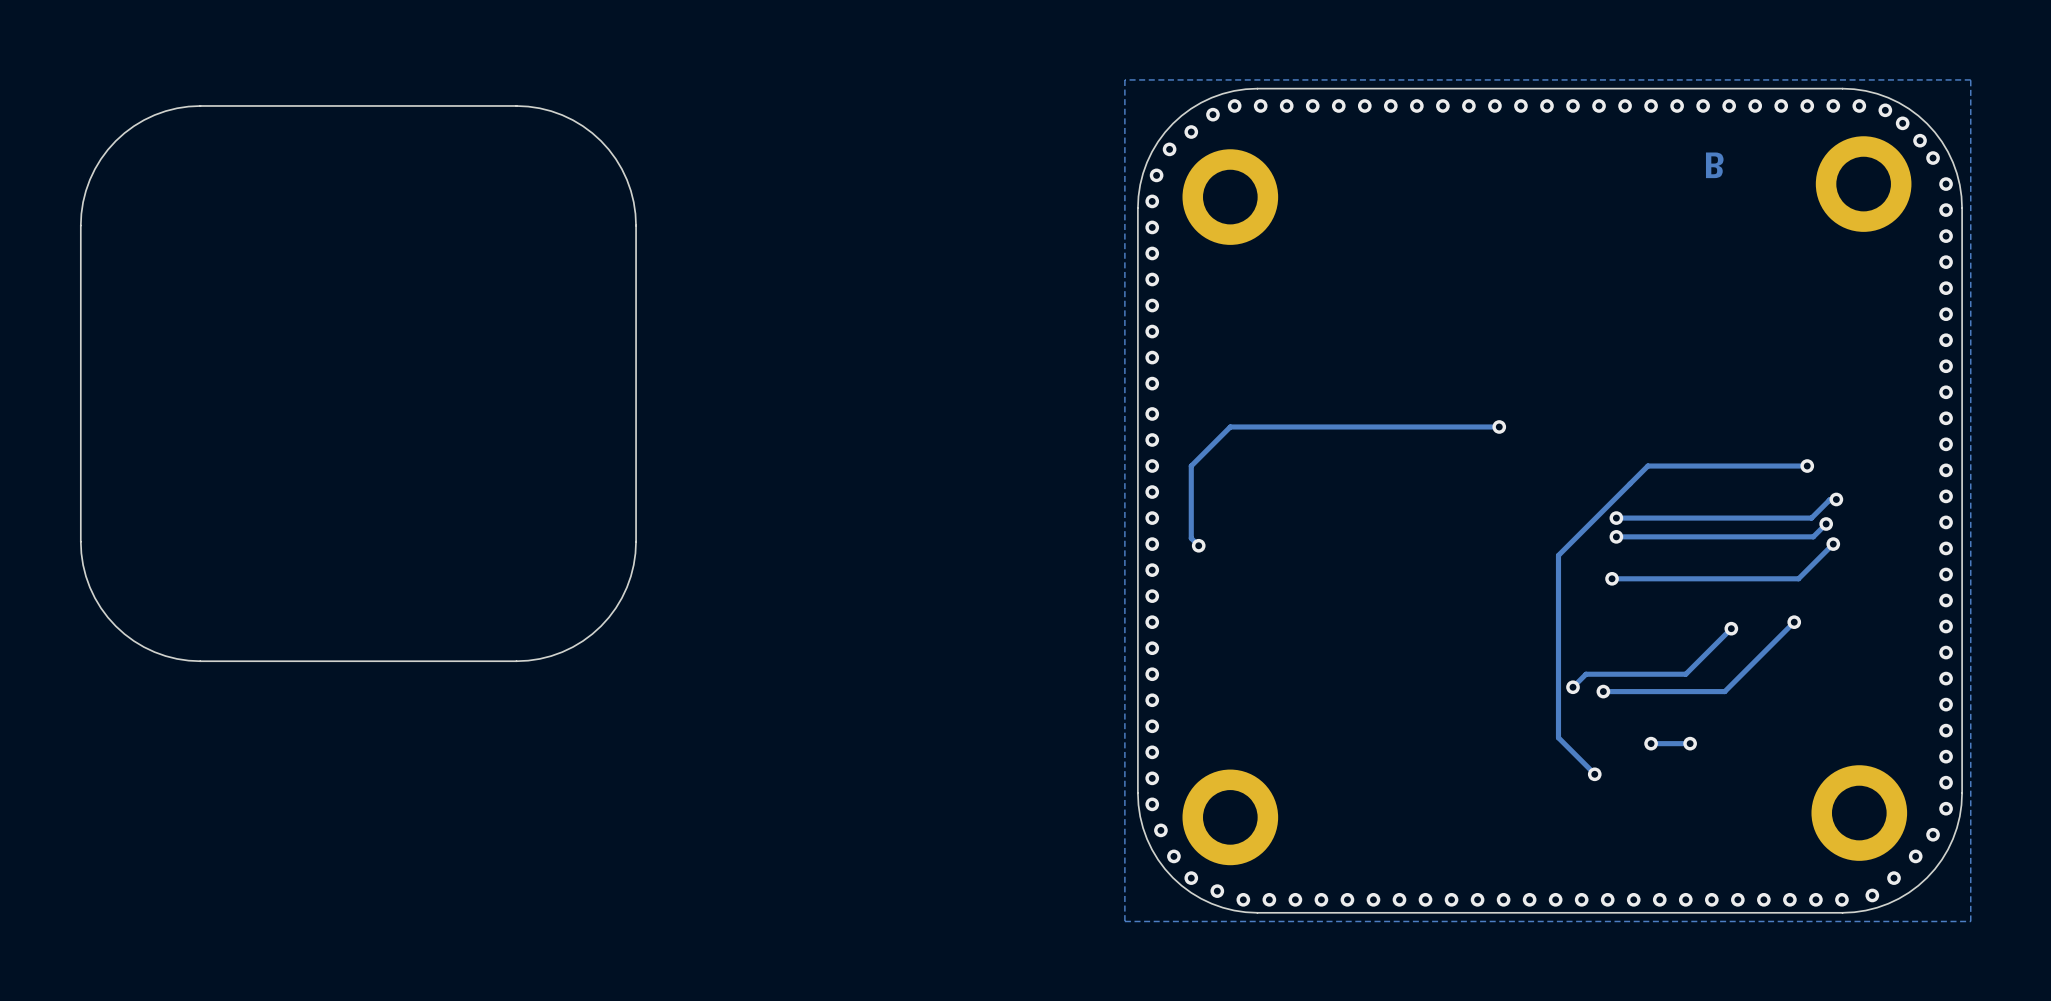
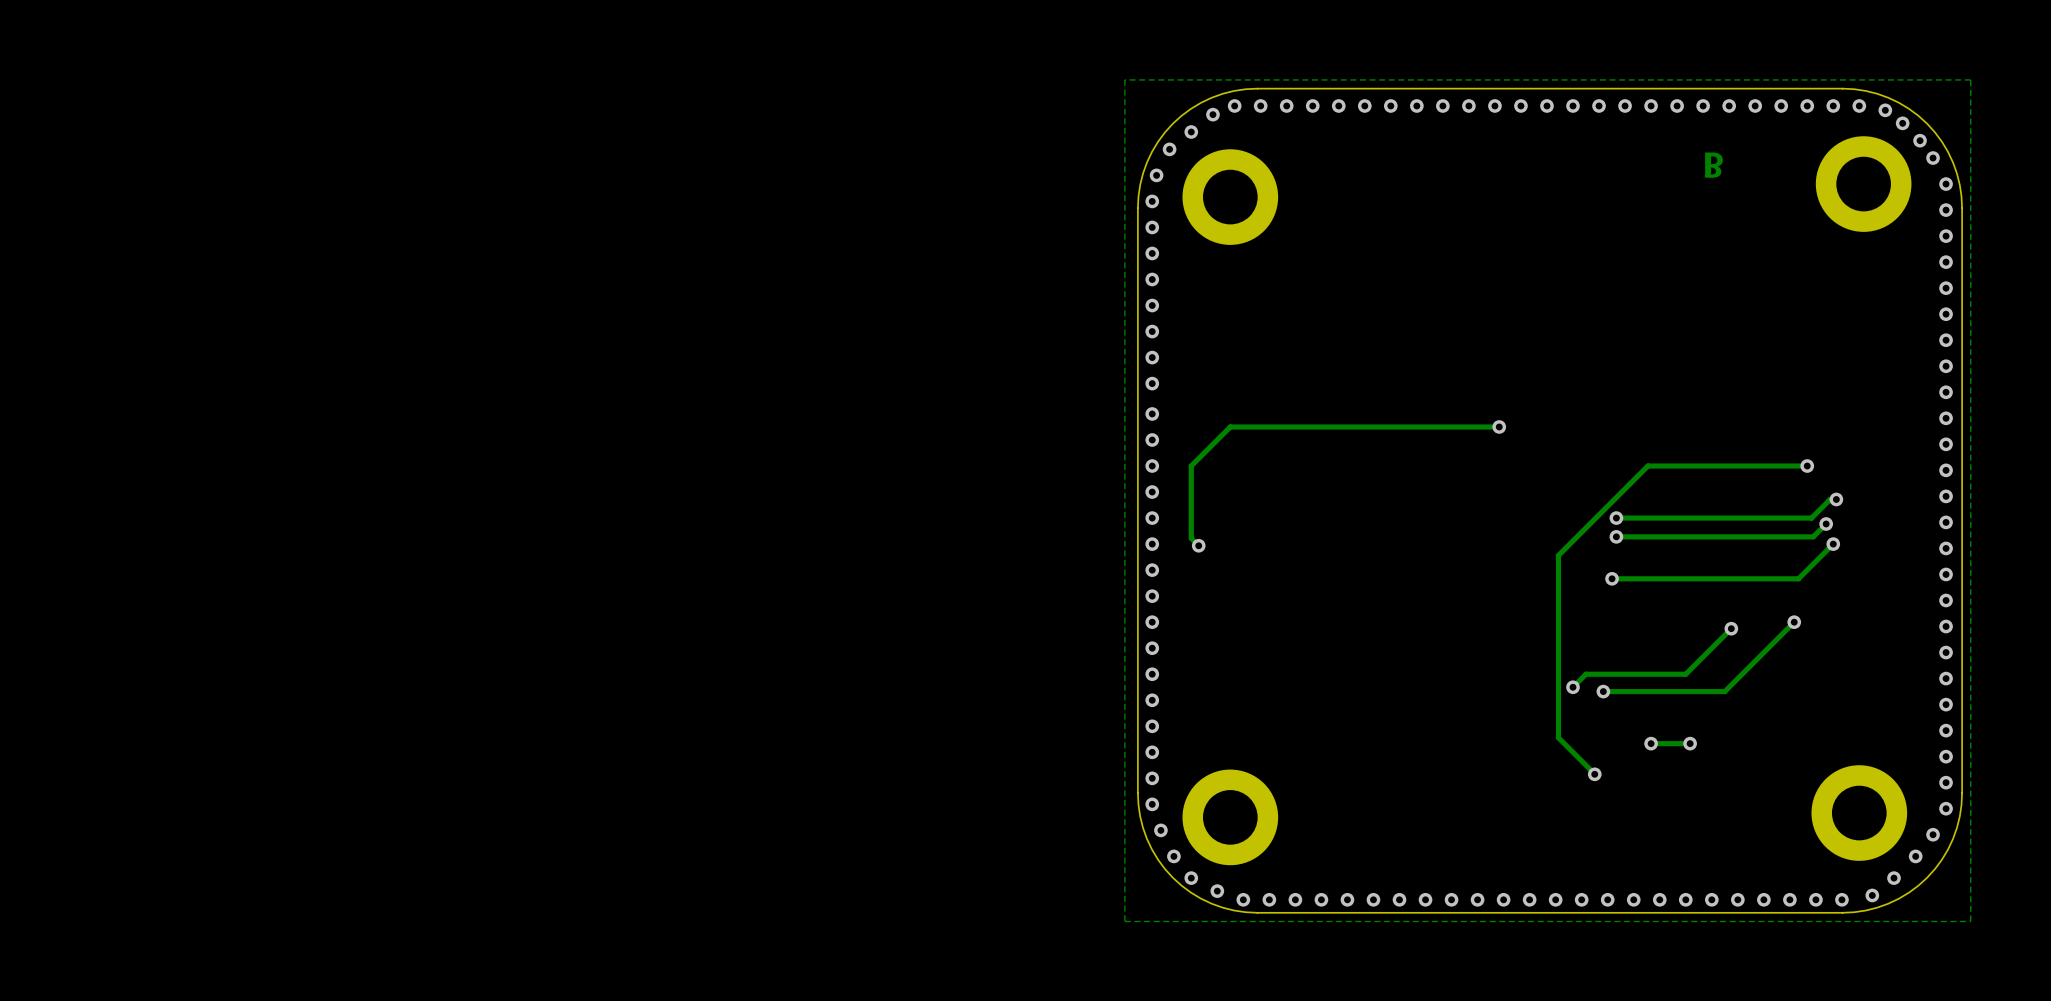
board edge: (516, 105) (188, 106) (165, 111) (144, 120) (124, 133) (100, 159) (85, 190) (81, 213) (81, 553) (85, 576) (100, 608) (115, 626) (133, 641) (165, 656) (188, 660) (528, 660) (551, 656) (572, 647) (601, 626) (615, 608) (630, 576) (636, 541) (636, 225) (633, 202) (621, 169) (608, 149) (592, 133) (562, 115) (539, 108) (516, 105) -> none

